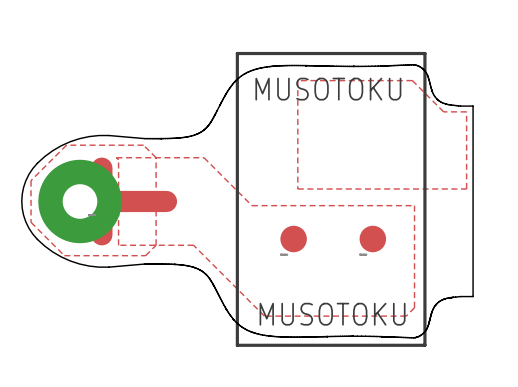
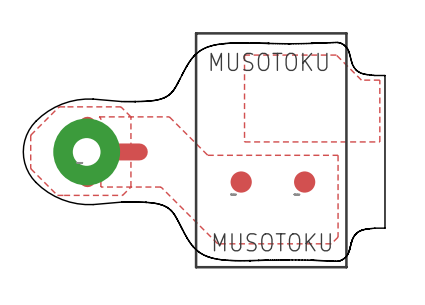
via position: (80, 201) -> (86, 151)

